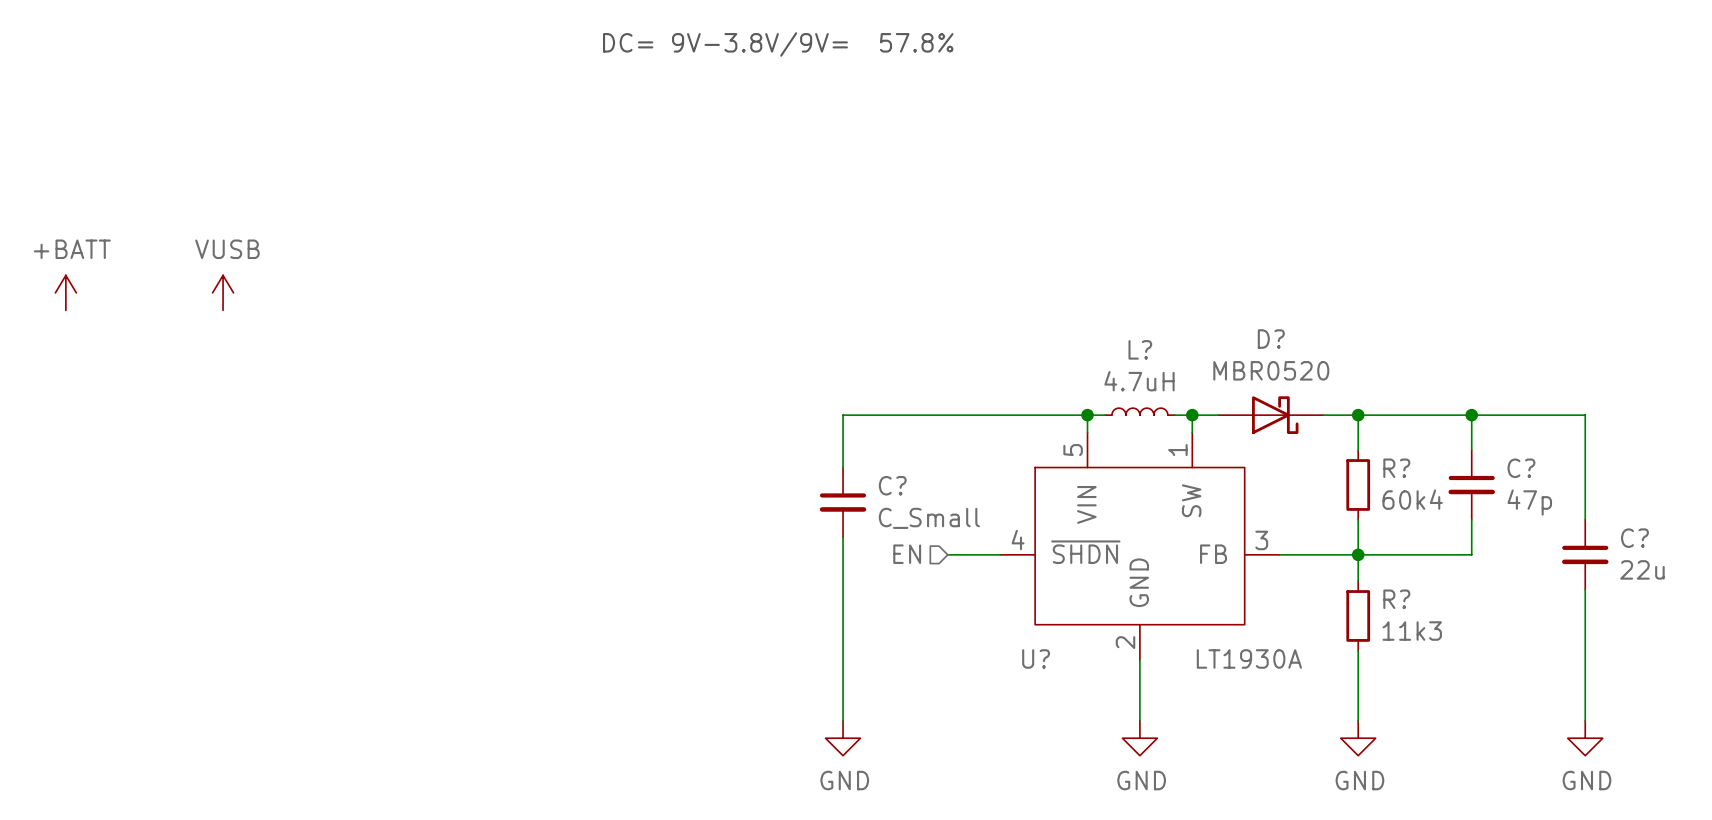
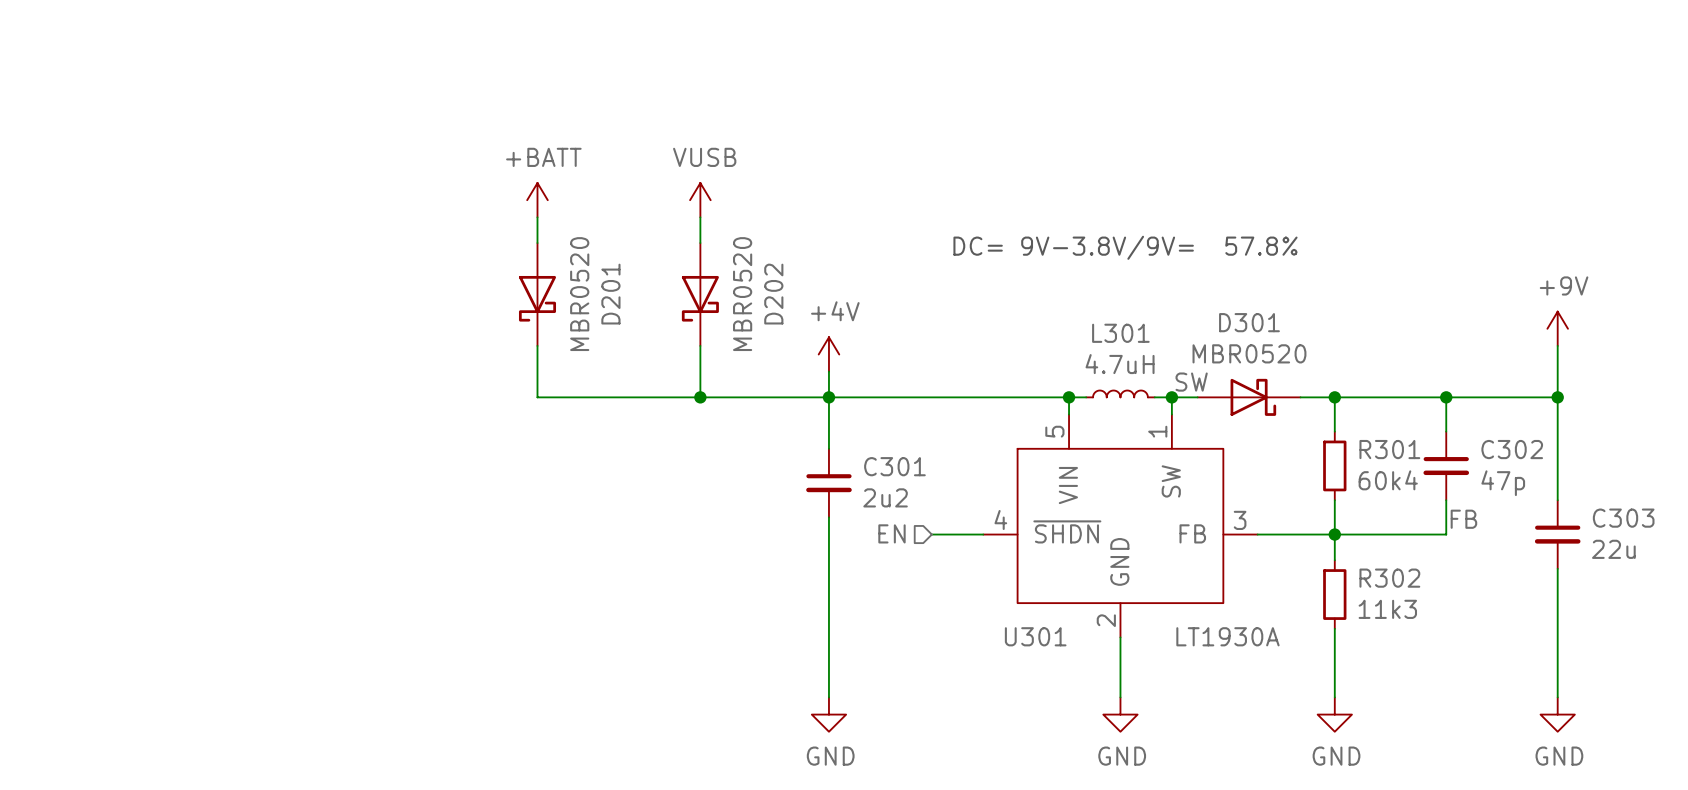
text: DC= 9V-3.8V/9V= 57.8% (778, 44) -> none
power symbol: none -> +BATT (537, 200)
power symbol: none -> VUSB (700, 200)
wire: none -> (537, 217) (537, 243)
wire: none -> (700, 217) (700, 243)
text: none -> DC= 9V-3.8V/9V= 57.8% (1125, 247)
power symbol: +BATT (65, 292) -> none
power symbol: VUSB (223, 292) -> none
D201: none -> MBR0520 (537, 294)
D202: none -> MBR0520 (700, 294)
D? name: D? (1271, 339) -> D301 (1249, 322)
power symbol: none -> +9V (1557, 328)
L? name: L? (1140, 349) -> L301 (1120, 333)
wire: none -> (537, 345) (537, 397) (828, 397) (828, 371)
wire: none -> (700, 345) (700, 397)
wire: none -> (1557, 345) (1557, 397)
power symbol: none -> +4V (828, 354)
label: none -> SW (1191, 382)
junction: none -> (700, 397)
junction: none -> (828, 397)
junction: none -> (1557, 397)
R? name: R? (1396, 468) -> R301 (1389, 449)
C? name: C? (1521, 468) -> C302 (1512, 449)
C? name: C? (892, 485) -> C301 (894, 466)
C? value: C_Small (929, 518) -> 2u2 (885, 497)
C? name: C? (1634, 538) -> C303 (1623, 518)
label: none -> FB (1463, 519)
R? name: R? (1396, 599) -> R302 (1389, 578)
U? name: U? (1036, 658) -> U301 (1035, 636)

